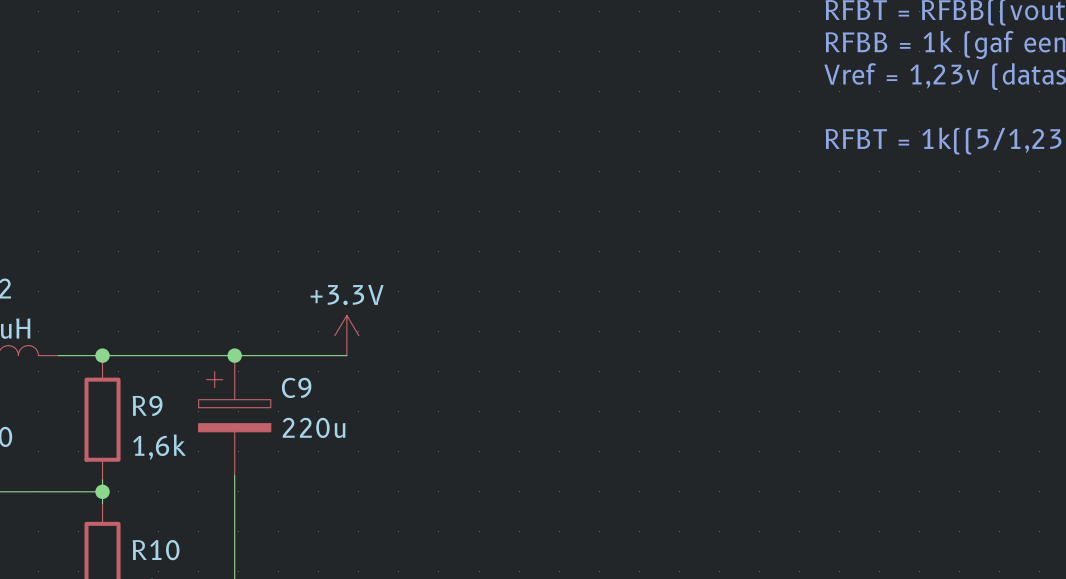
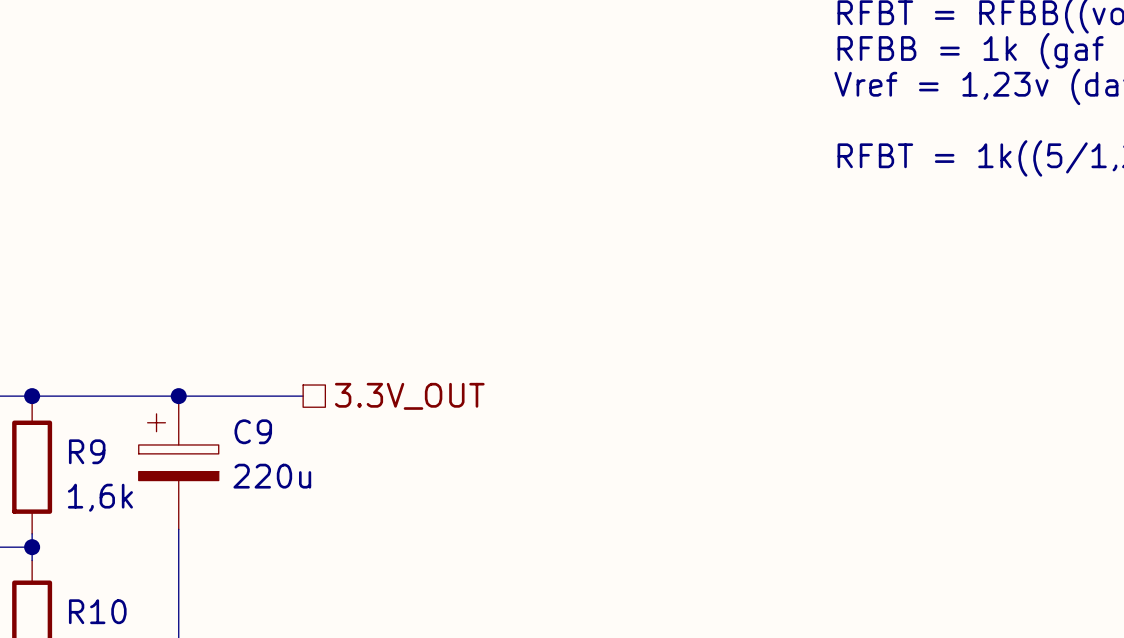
power symbol: +3.3V (346, 335) -> none
hierarchical label: none -> 3.3V_OUT (409, 396)

